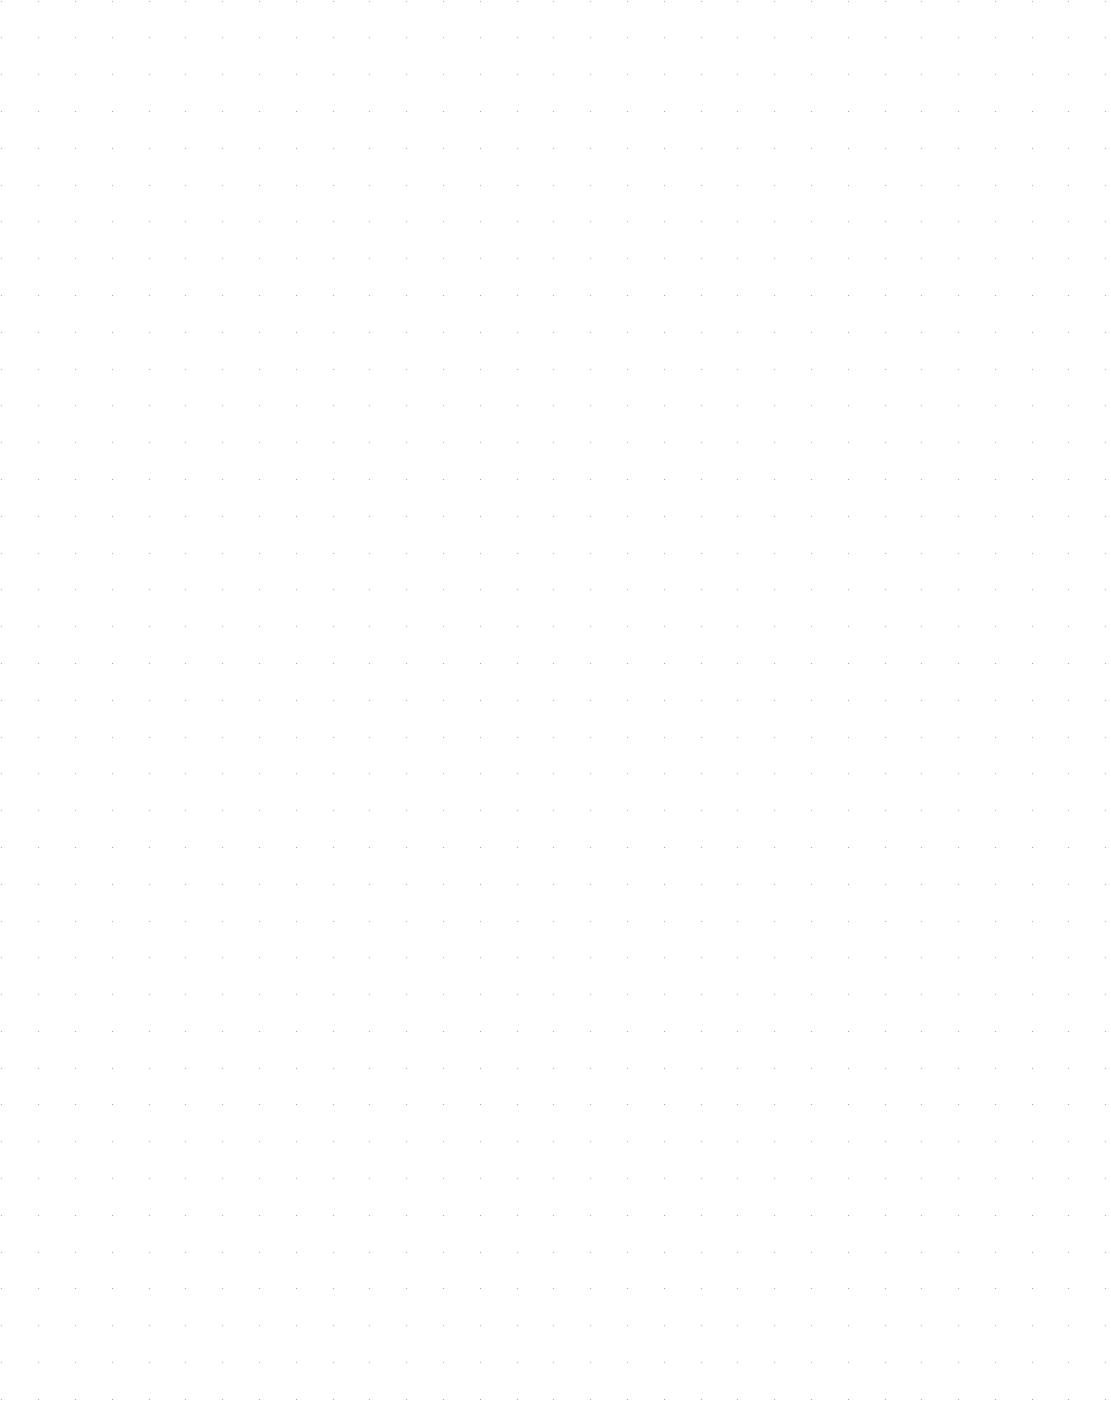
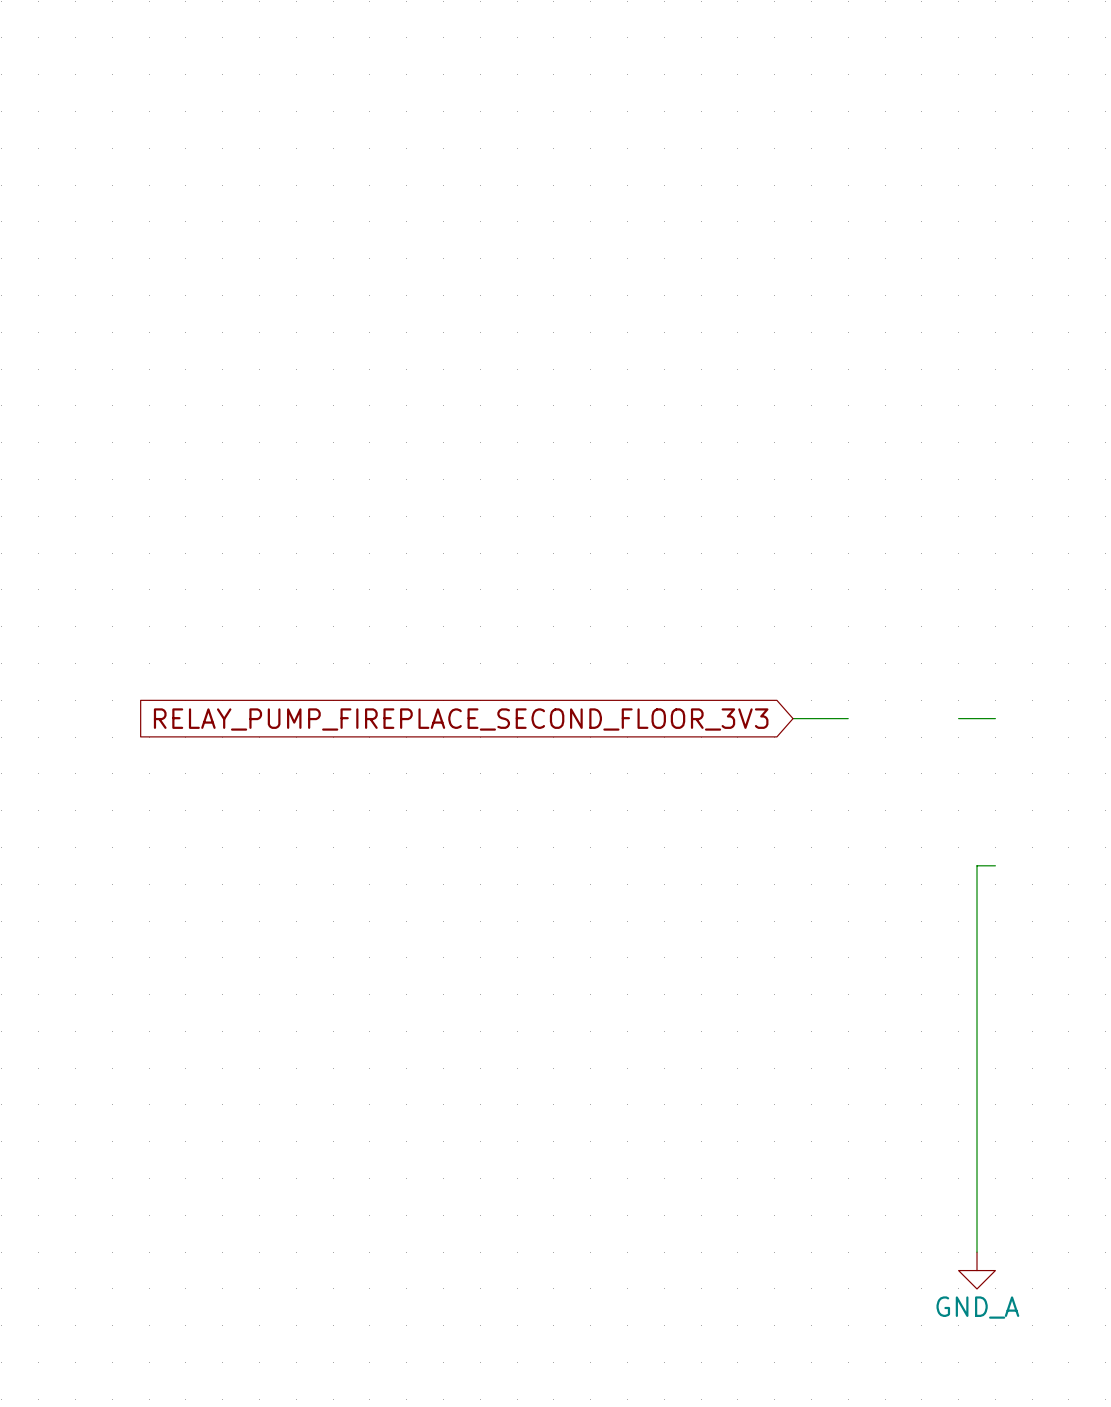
wire: none -> (793, 718) (848, 718)
wire: none -> (958, 718) (995, 718)
global label: none -> RELAY_PUMP_FIREPLACE_SECOND_FLOOR_3V3 (461, 719)
wire: none -> (995, 865) (977, 865) (977, 1252)
power symbol: none -> GND_A (977, 1270)

